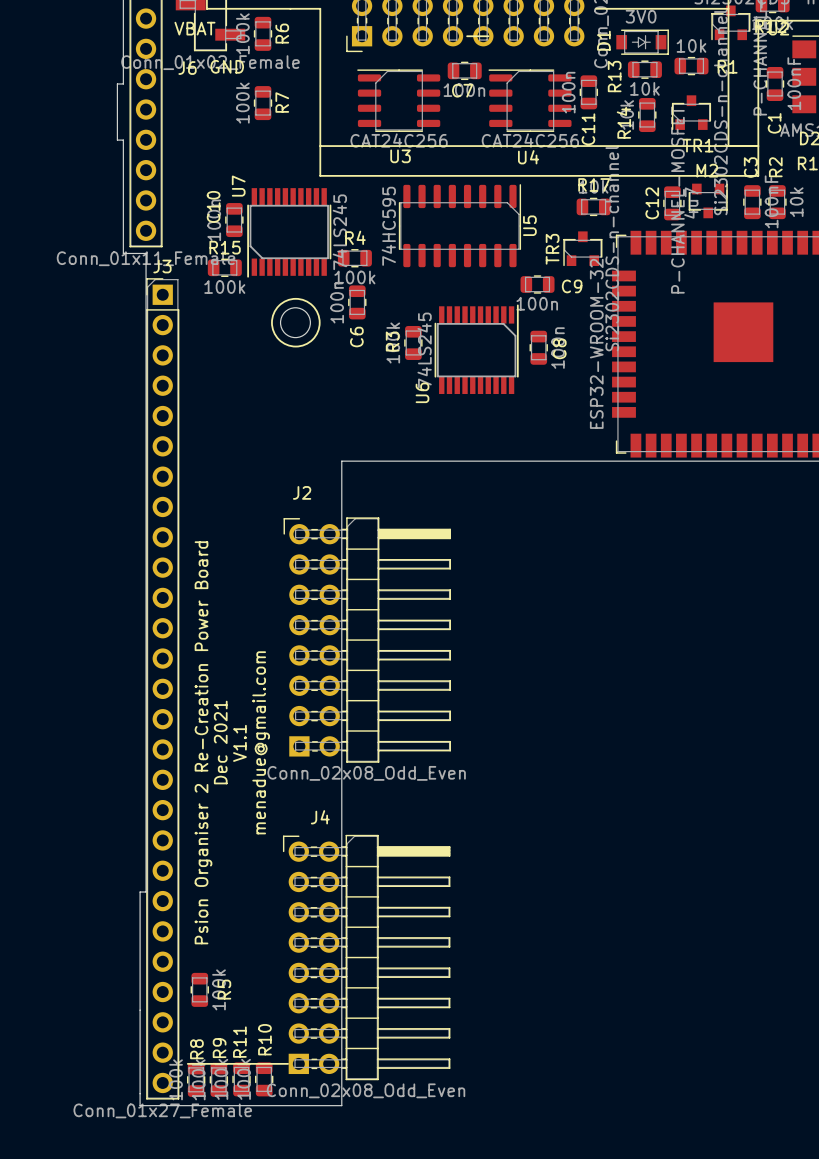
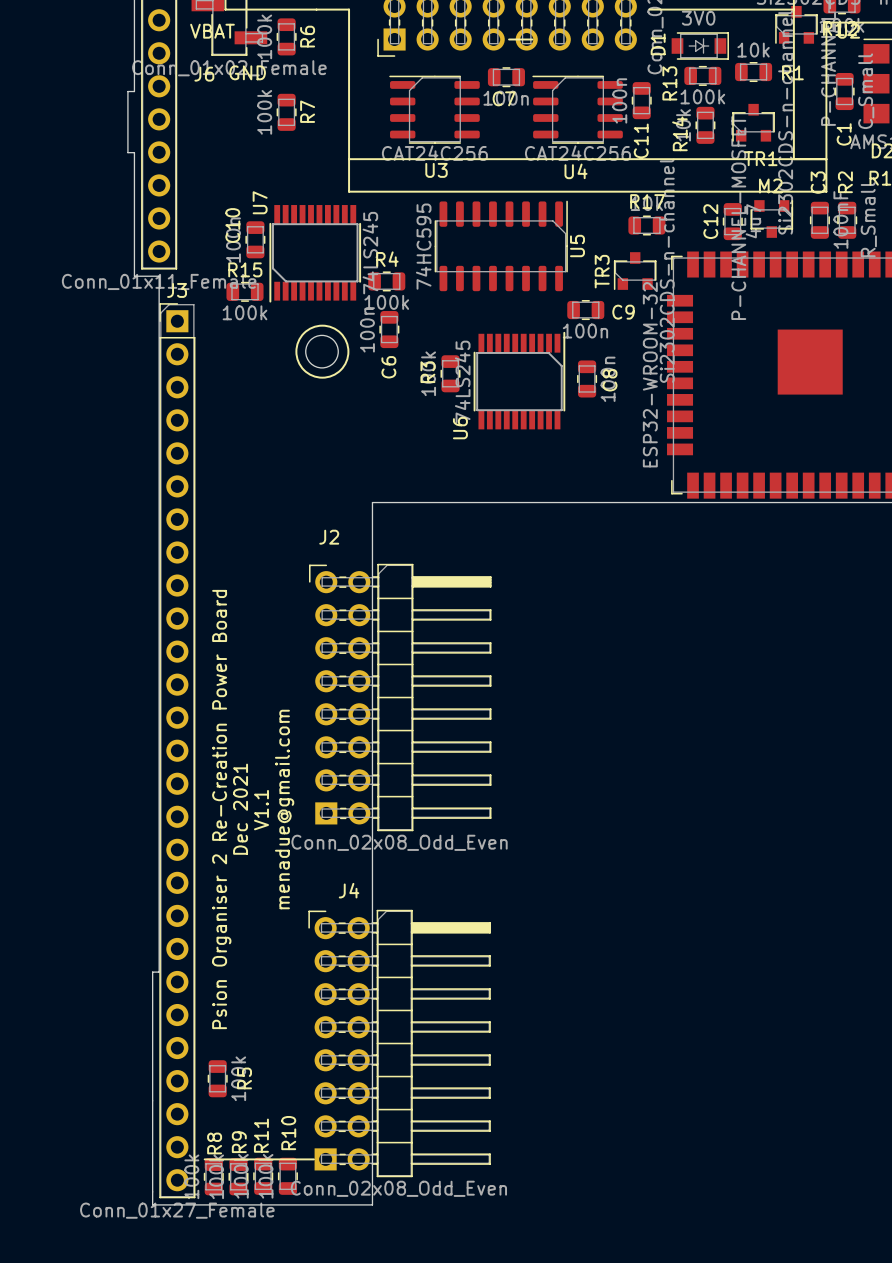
C1 value: 100nF (794, 83) -> C_Small (866, 91)
R13 value: 10k (644, 88) -> 100k (702, 96)
R2 value: 10k (796, 202) -> R_Small (868, 219)

